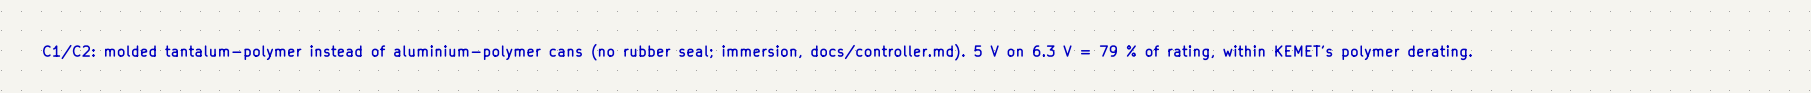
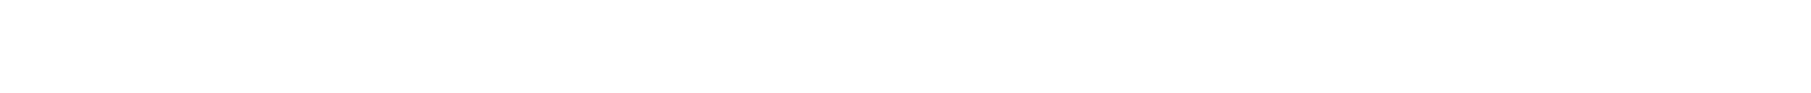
text: C1/C2: molded tantalum-polymer instead of aluminium-polymer cans (no rubber seal; immersion, docs/controller.md). 5 V on 6.3 V = 79 % of rating, within KEMET's polymer derating. (757, 52) -> none

